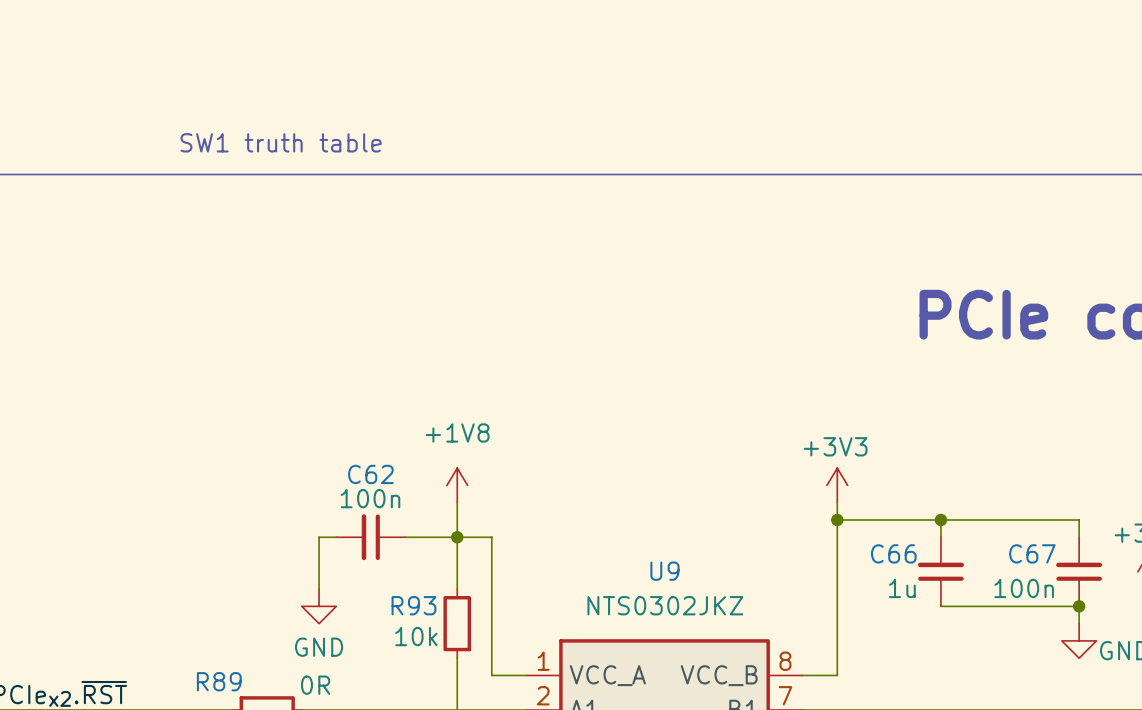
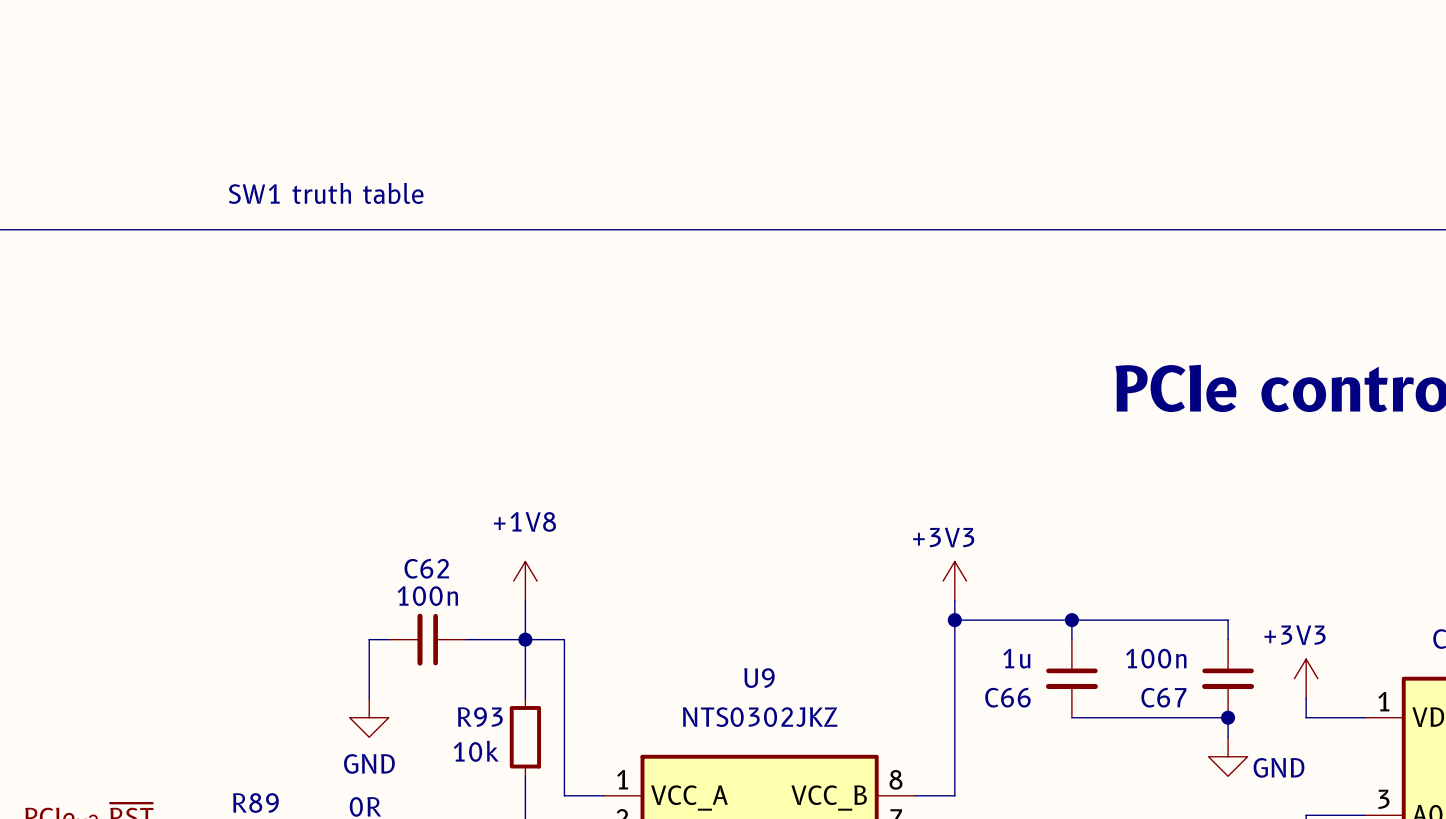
C66 name position: C66 (893, 553) -> C66 (1007, 697)
C67 name position: C67 (1032, 553) -> C67 (1163, 697)
C66 rotation: 0° (940, 571) -> 180° (1071, 678)
C67 rotation: 0° (1079, 571) -> 180° (1228, 678)
C66 text position: 1u (902, 588) -> 1u (1016, 658)
C67 text position: 100n (1024, 588) -> 100n (1156, 658)

